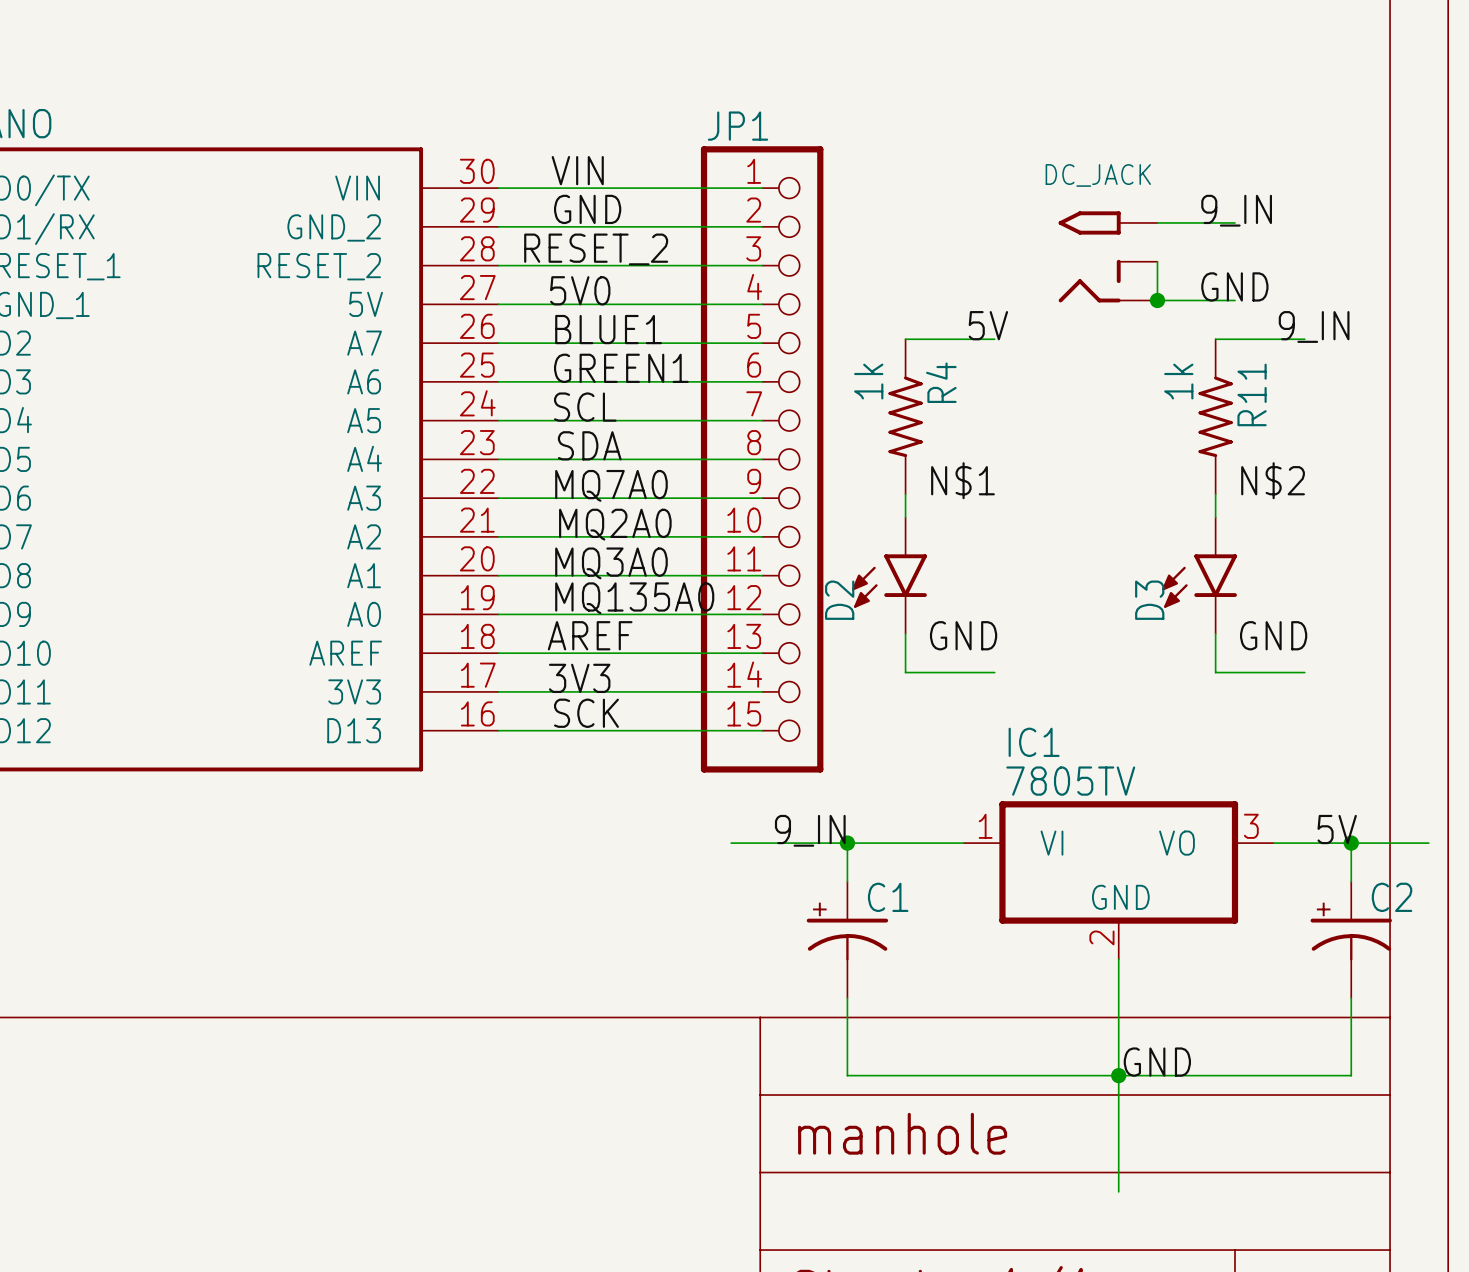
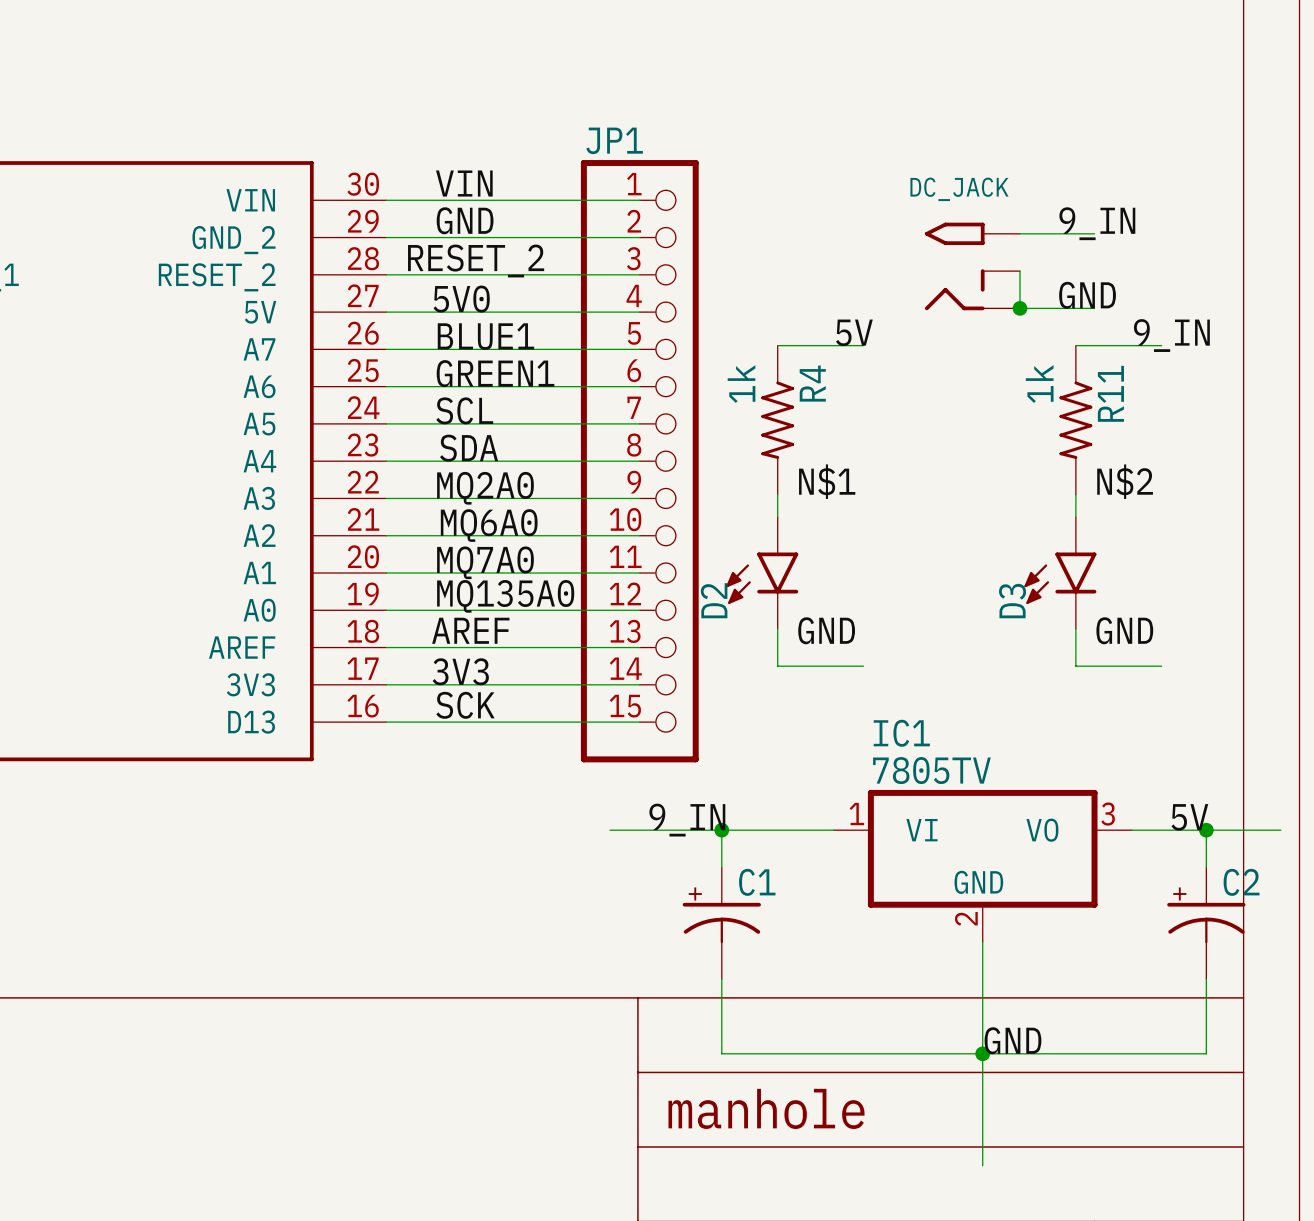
label: MQ7A0 (611, 485) -> MQ2A0 (485, 488)
label: MQ2A0 (615, 524) -> MQ6A0 (489, 525)
label: MQ3A0 (611, 563) -> MQ7A0 (485, 562)

